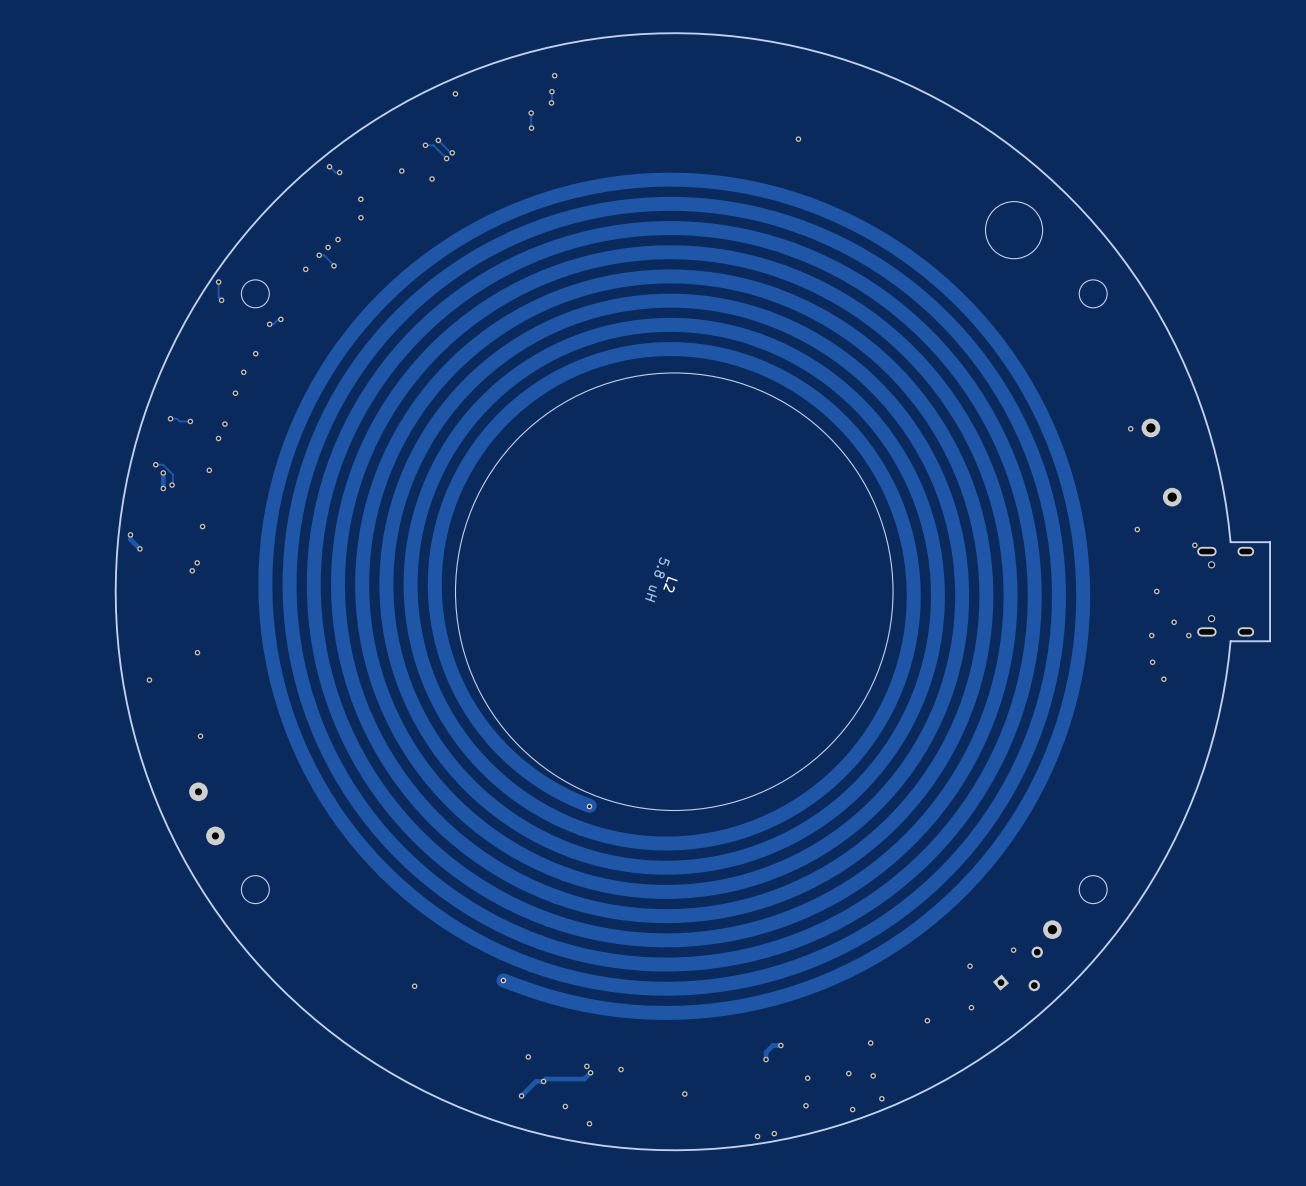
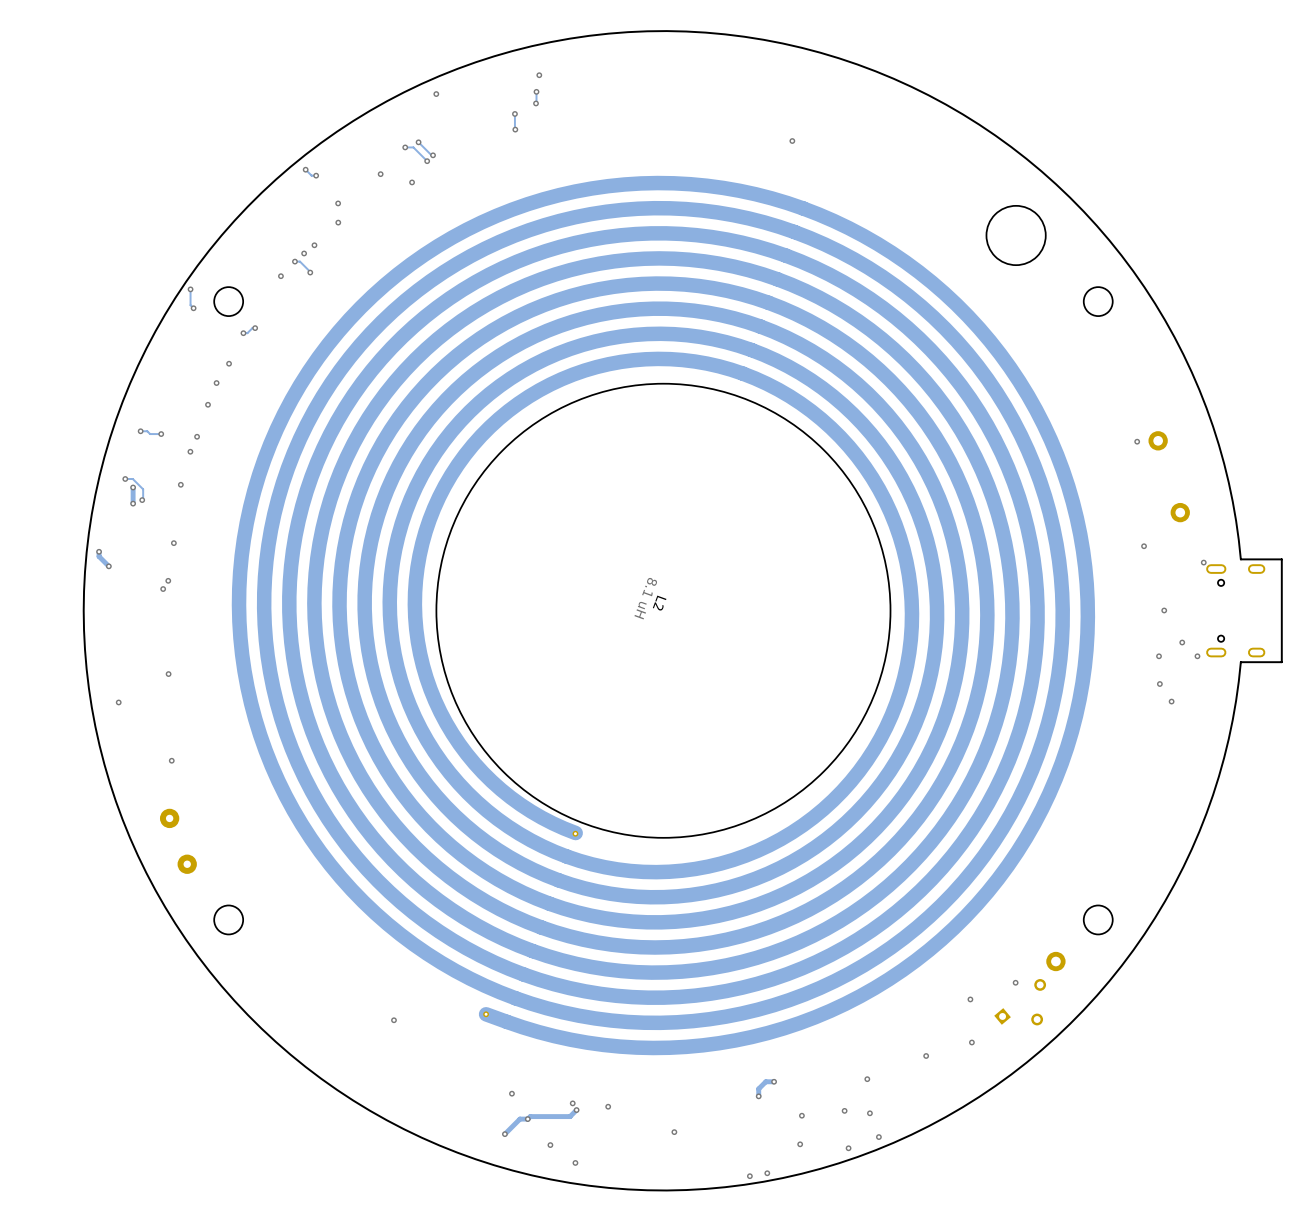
L2 value: 5.8 uH (657, 579) -> 8.1 uH (645, 598)

